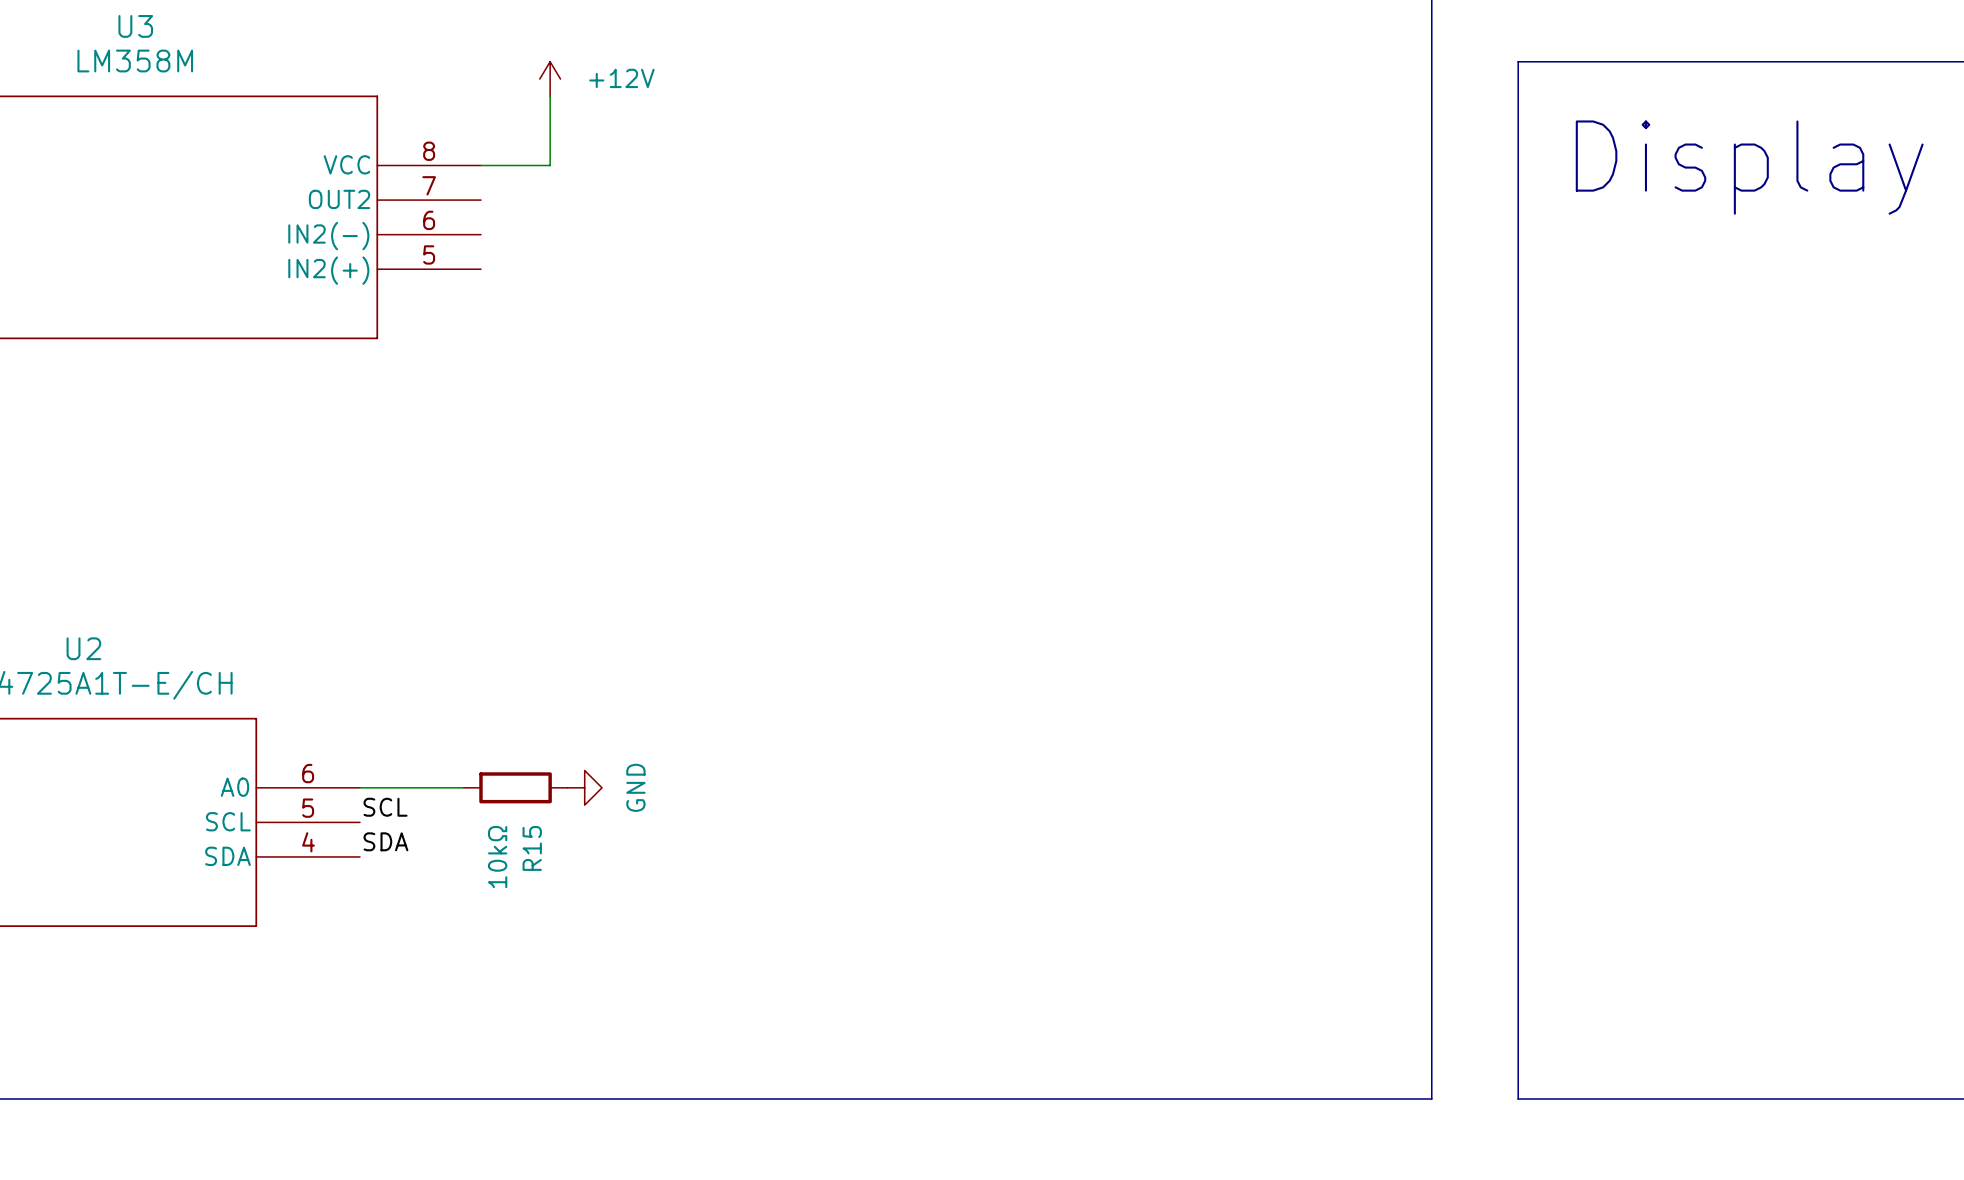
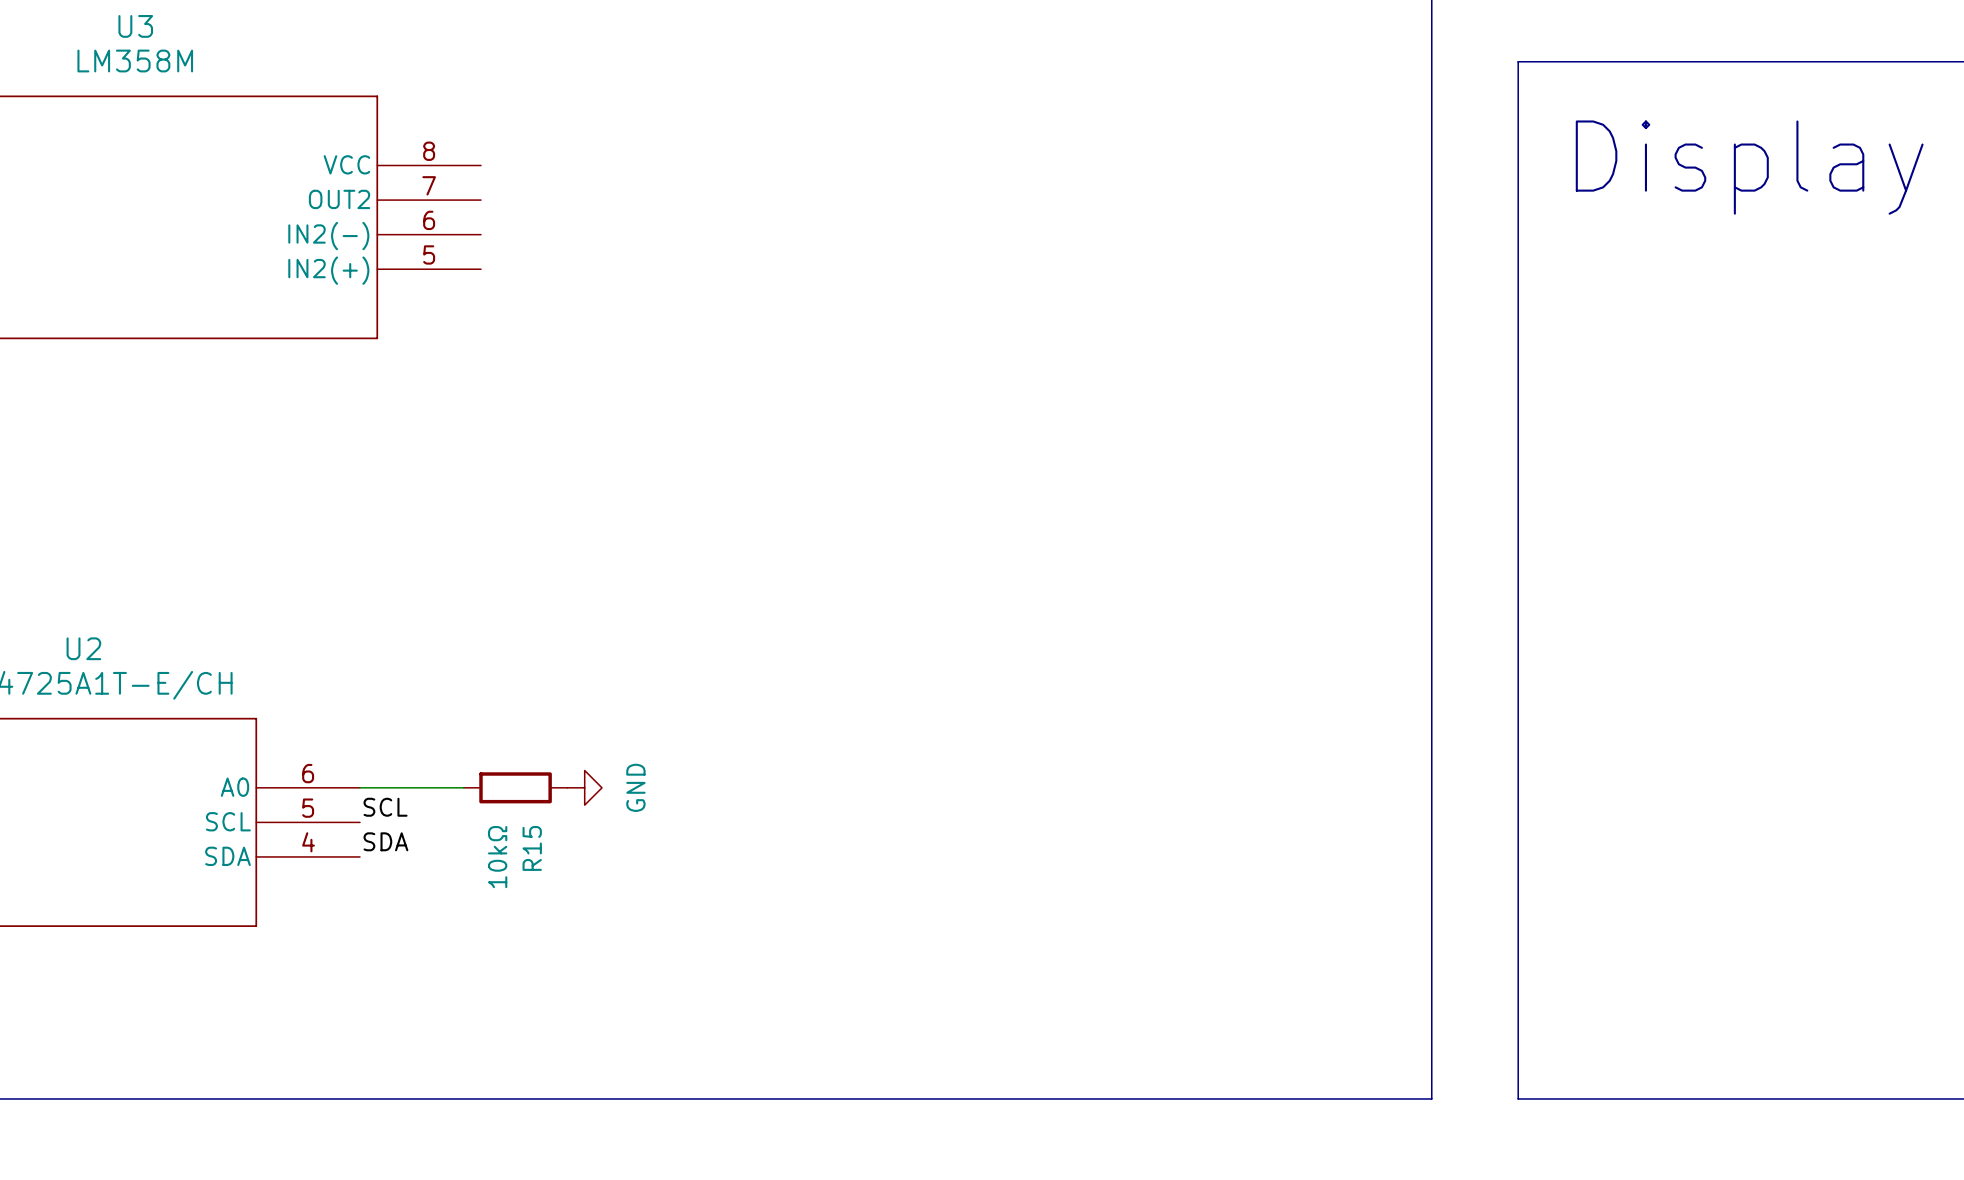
power symbol: +12V (550, 79) -> none
wire: (550, 96) (550, 165) (480, 165) -> none

